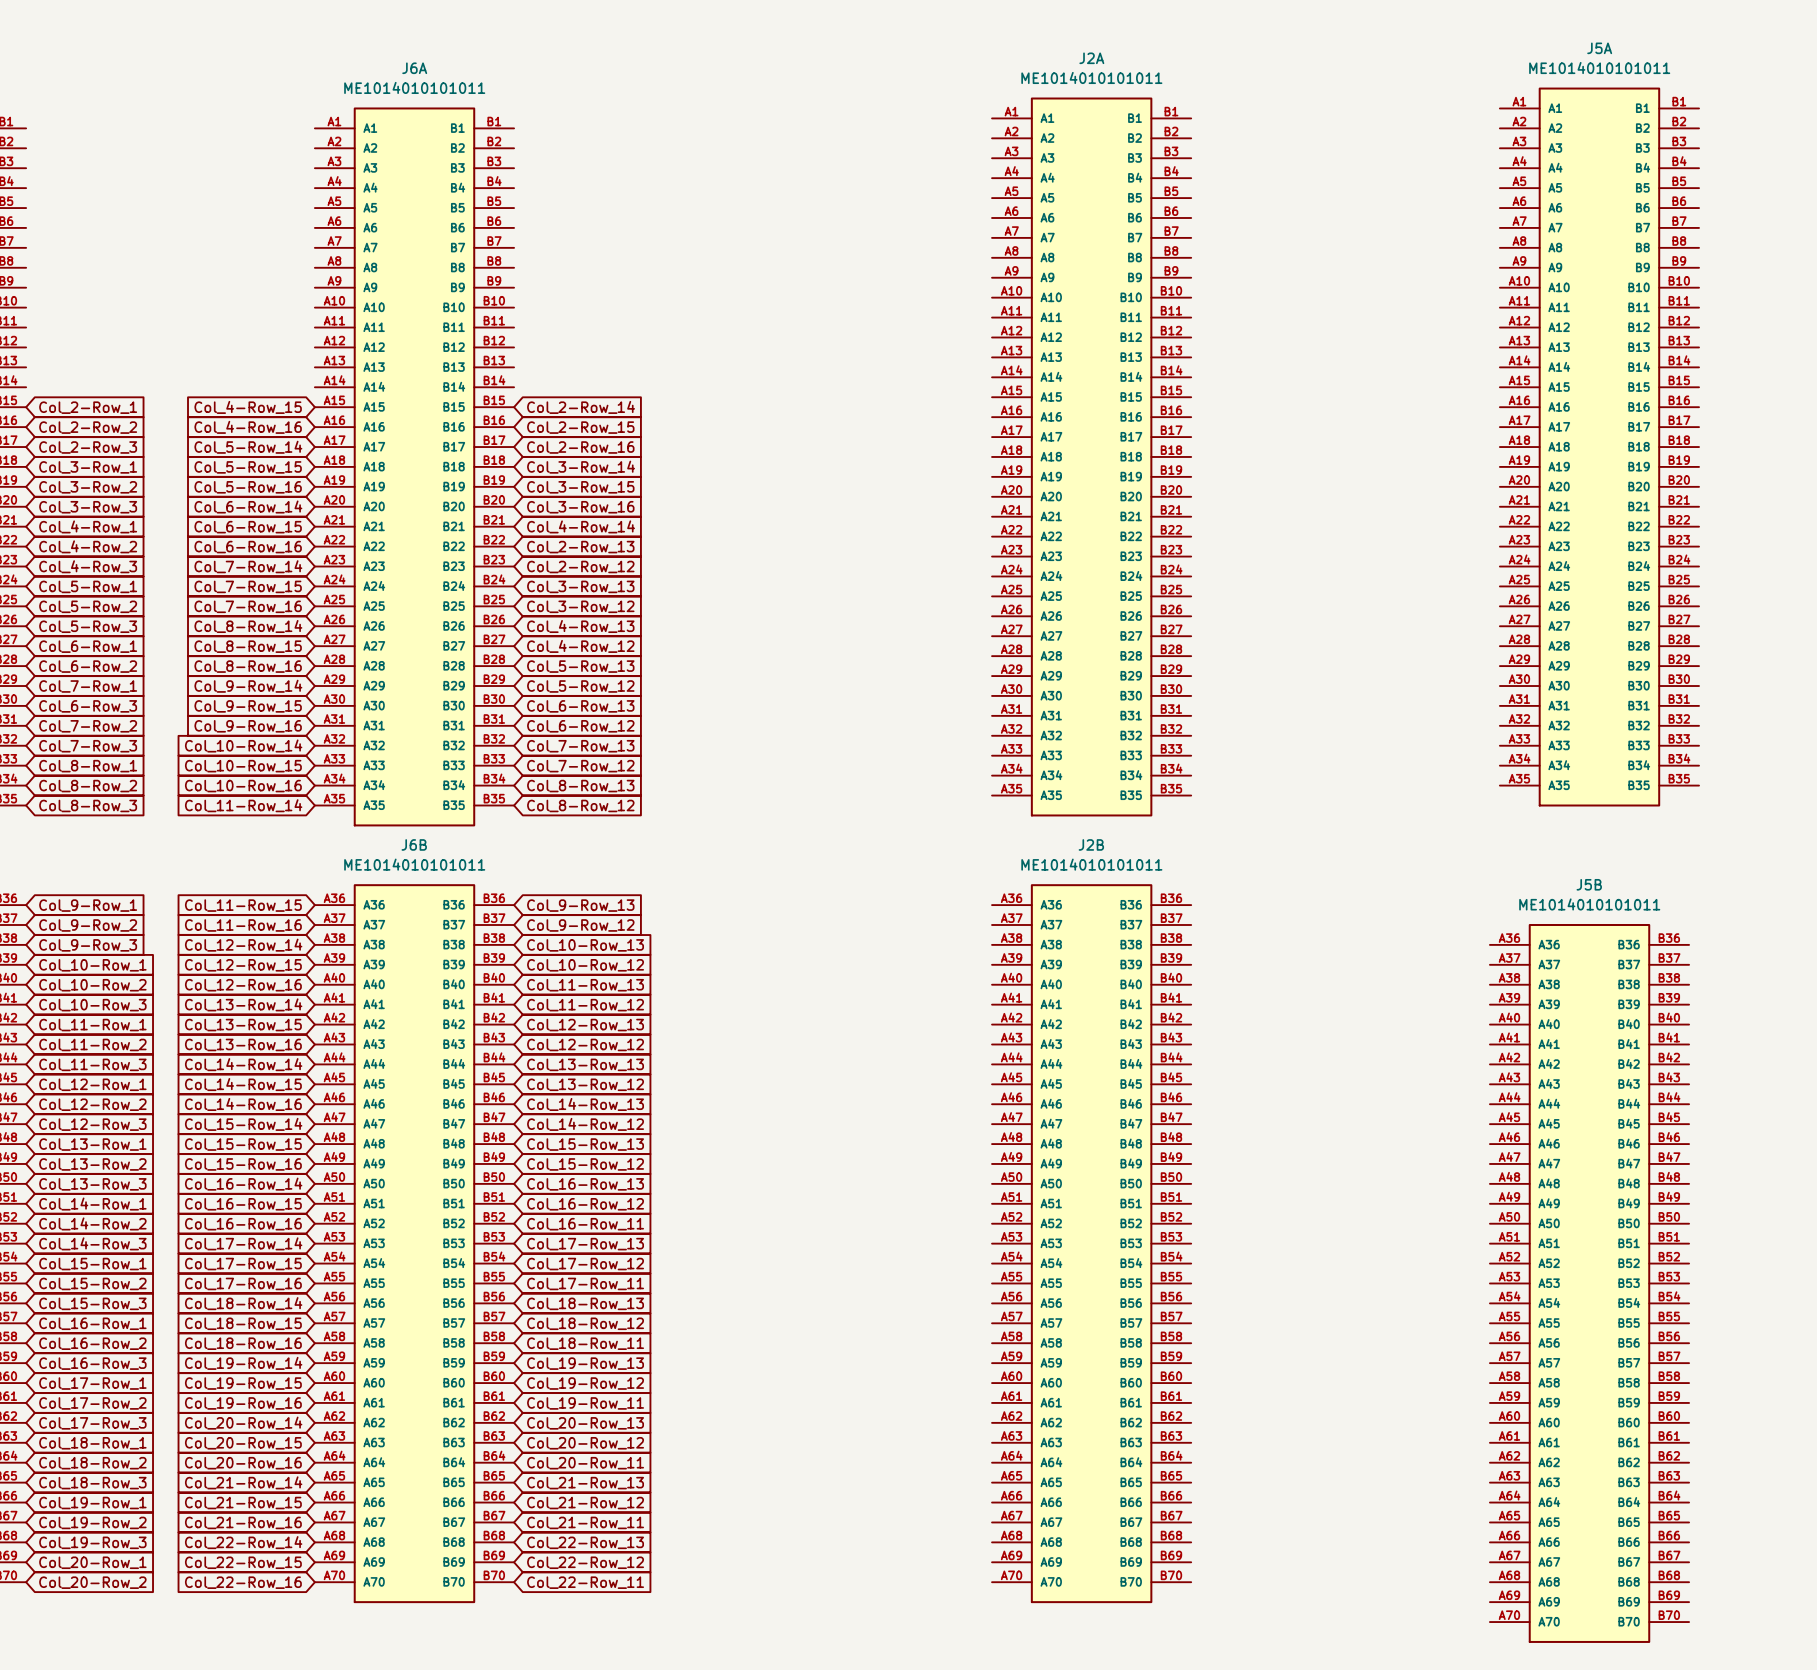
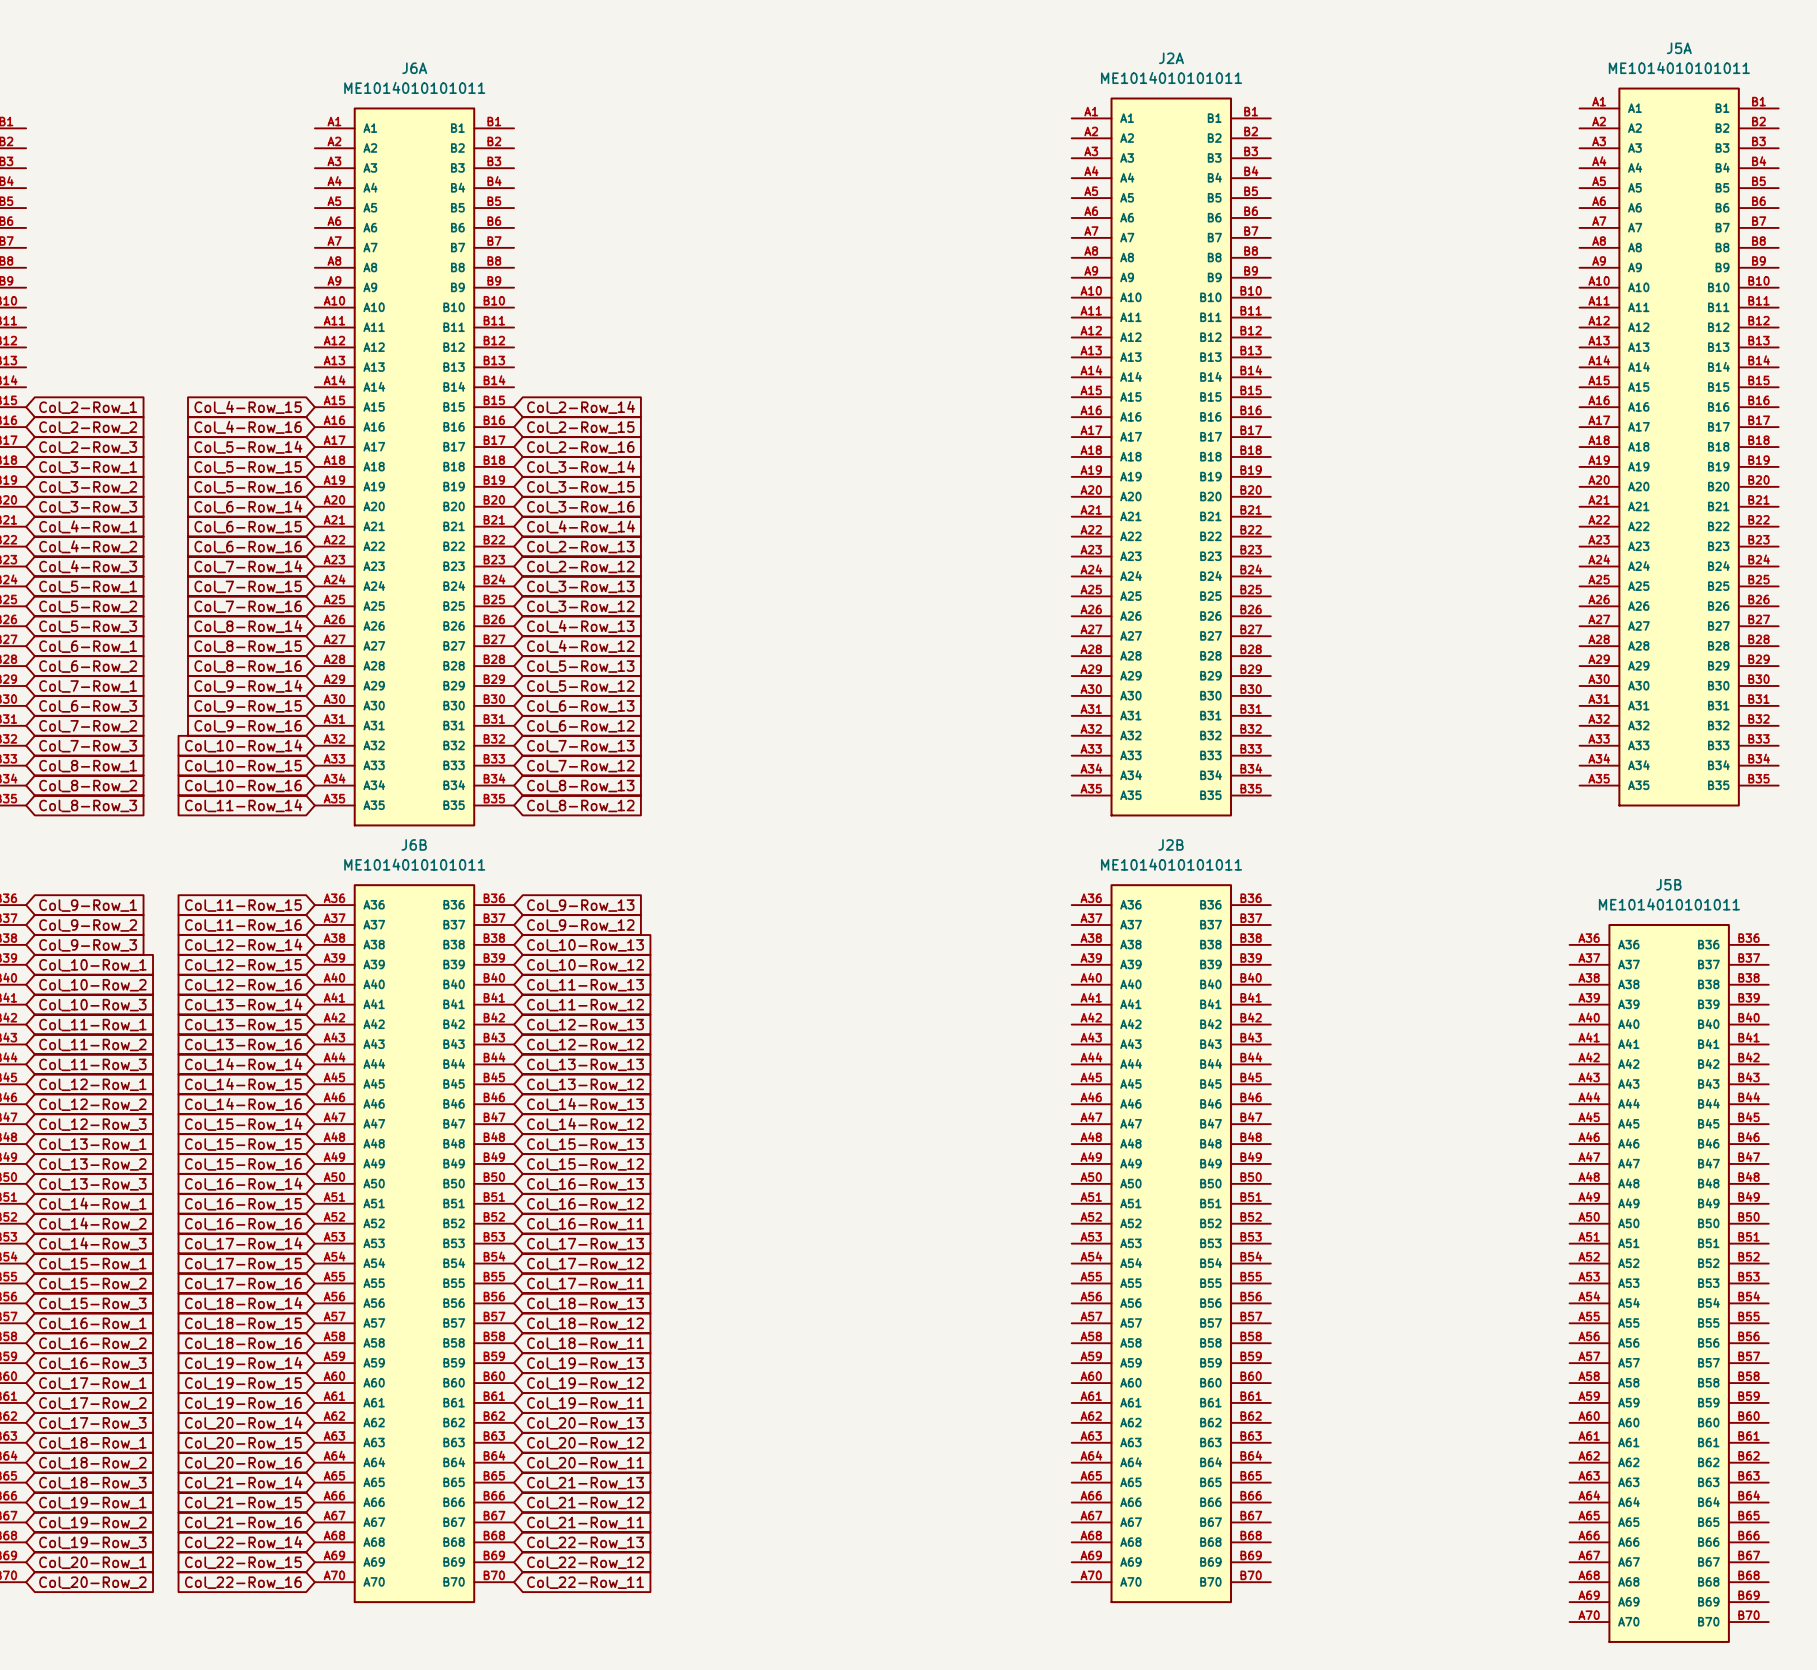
J5A position: (1599, 447) -> (1679, 447)
J2A position: (1091, 456) -> (1171, 456)
J2B position: (1091, 1243) -> (1171, 1243)
J5B position: (1589, 1283) -> (1669, 1283)

